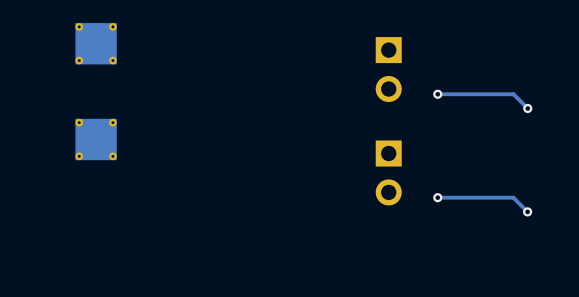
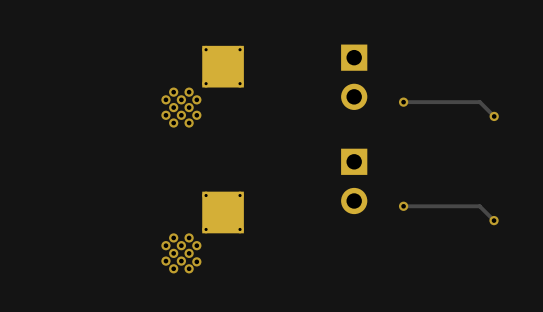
part: (96, 43) -> none
part: none -> (223, 66)
via: none -> (173, 92)
via: none -> (189, 92)
via: none -> (165, 99)
via: none -> (181, 99)
via: none -> (196, 99)
via: none -> (173, 107)
via: none -> (189, 107)
via: none -> (165, 115)
via: none -> (181, 115)
via: none -> (196, 115)
via: none -> (173, 123)
via: none -> (189, 123)
part: (96, 139) -> none
part: none -> (223, 212)
via: none -> (173, 237)
via: none -> (189, 237)
via: none -> (165, 245)
via: none -> (181, 245)
via: none -> (196, 245)
via: none -> (173, 253)
via: none -> (189, 253)
via: none -> (165, 261)
via: none -> (181, 261)
via: none -> (196, 261)
via: none -> (173, 268)
via: none -> (189, 268)

